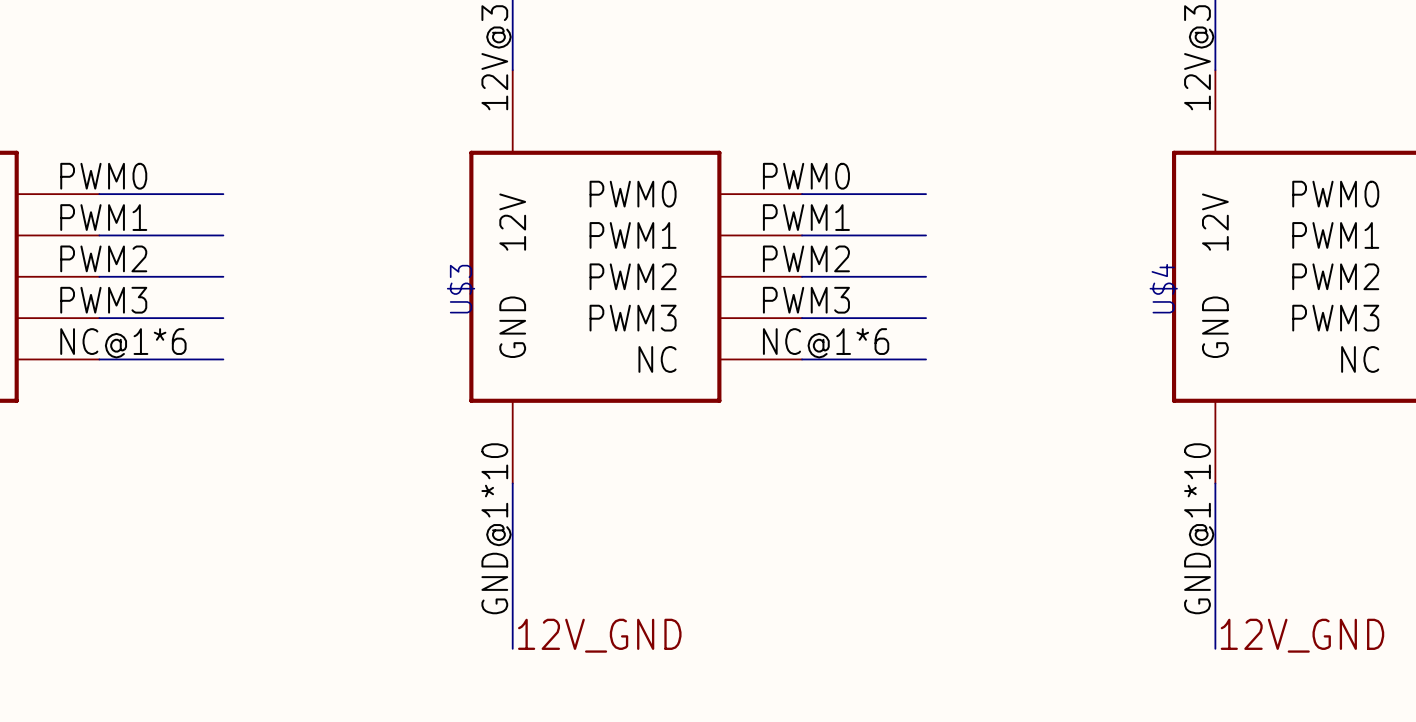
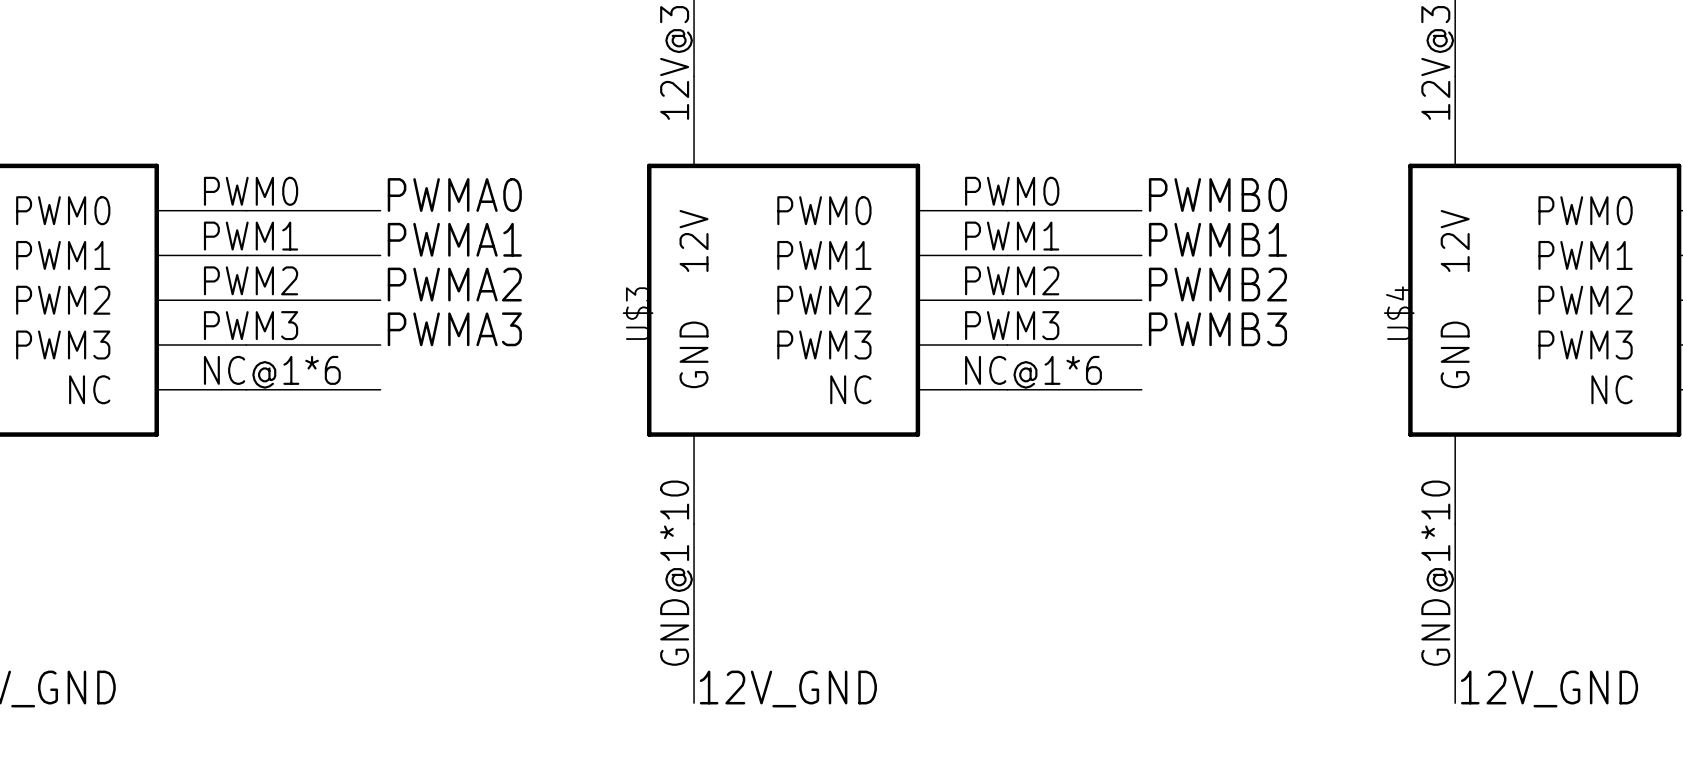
label: none -> PWMA0 (454, 195)
label: none -> PWMB0 (1217, 195)
label: none -> PWMA1 (454, 239)
label: none -> PWMB1 (1217, 239)
label: none -> PWMA2 (454, 284)
label: none -> PWMB2 (1217, 284)
label: none -> PWMA3 (454, 329)
label: none -> PWMB3 (1217, 329)

